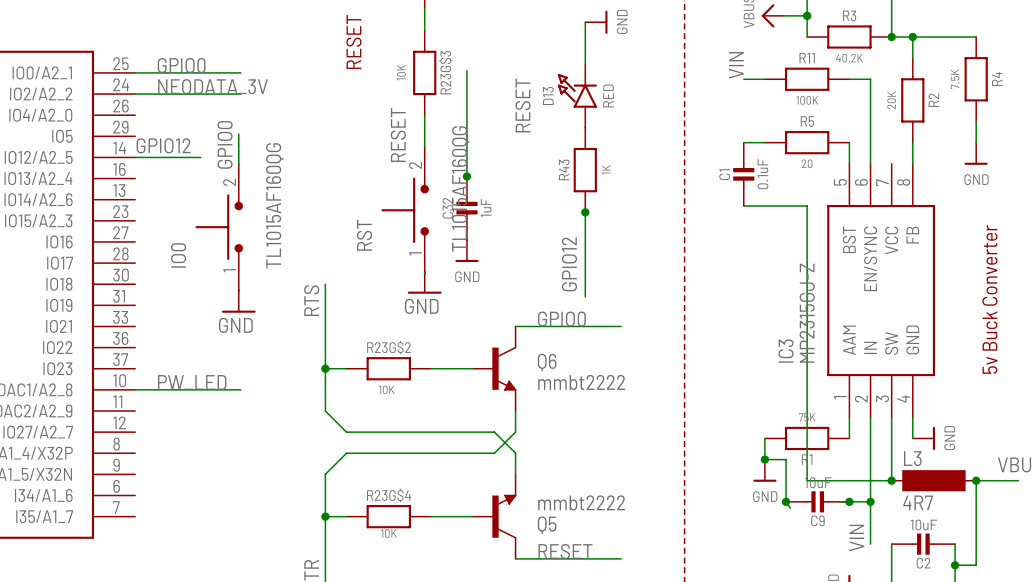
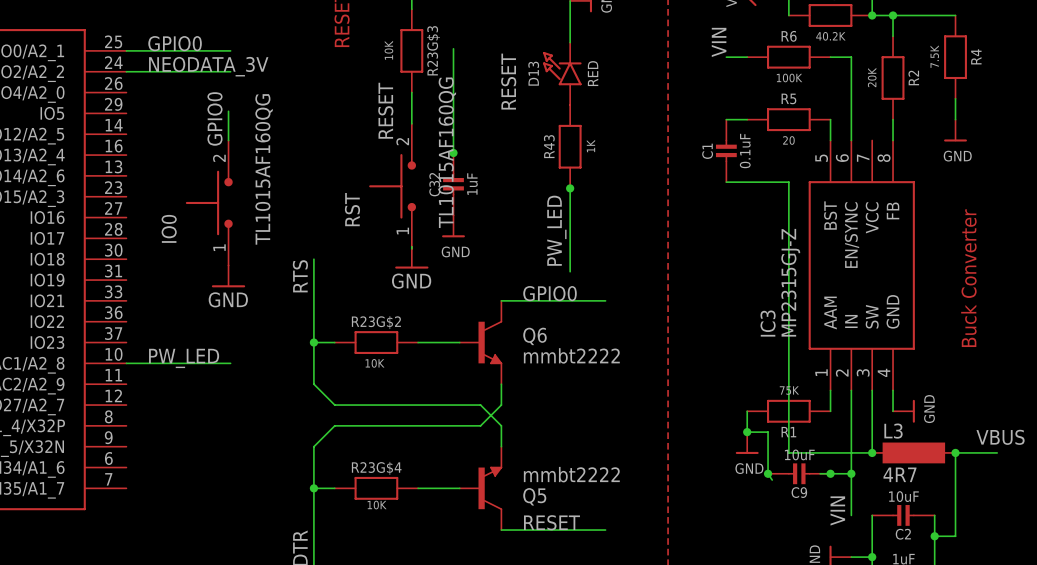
R11 name: R11 (807, 58) -> R6 (789, 36)
label: GPIO12 (163, 145) -> none
wire: (135, 157) (200, 157) -> none
label: GPIO12 (569, 264) -> PW_LED (556, 230)
text: 5v Buck Converter (989, 299) -> Buck Converter (968, 278)

